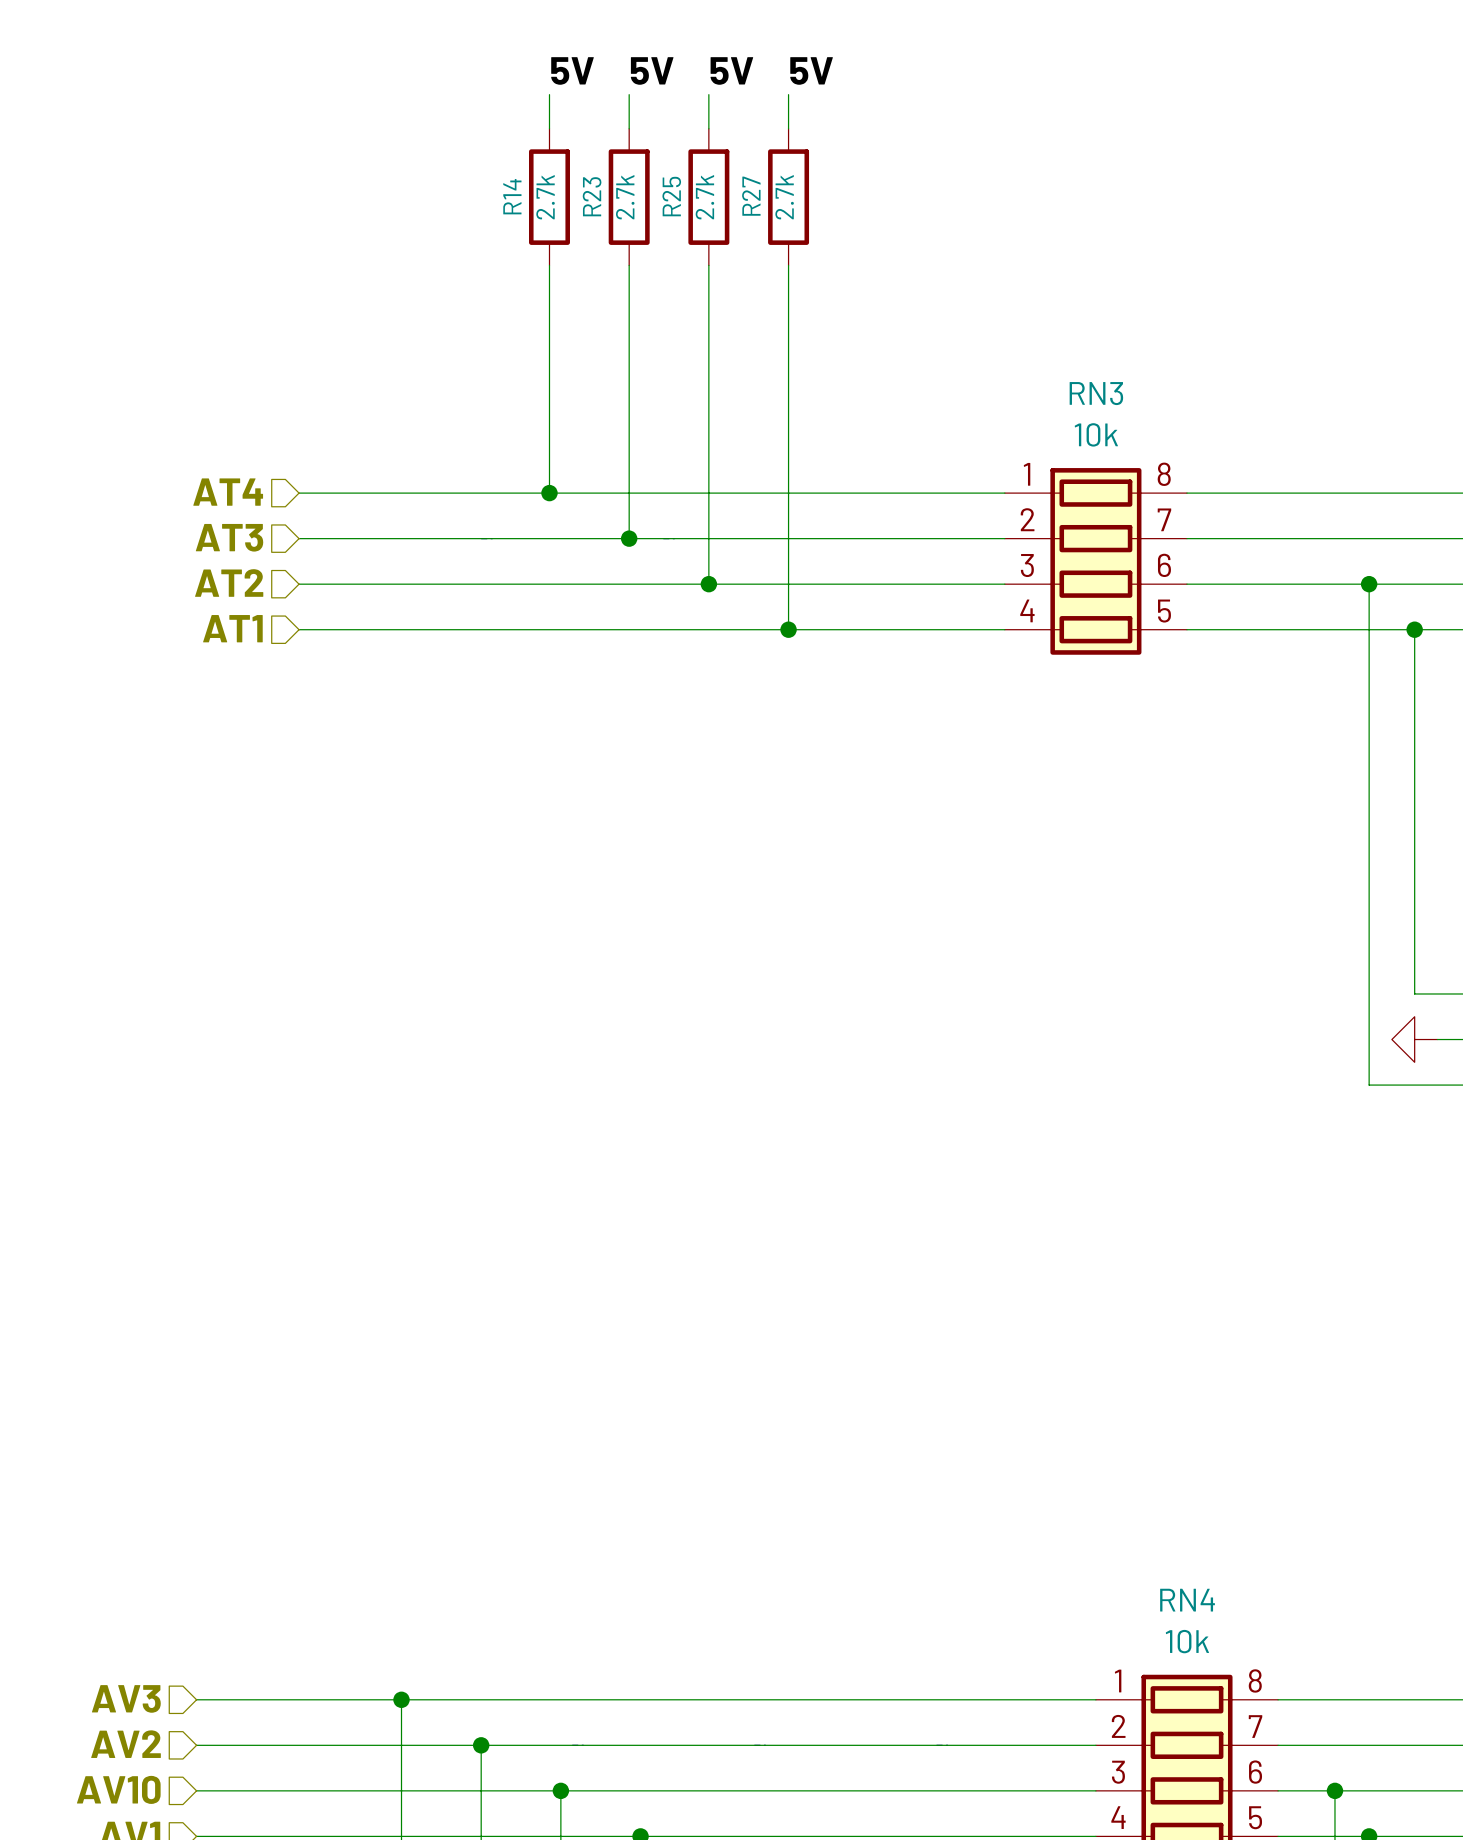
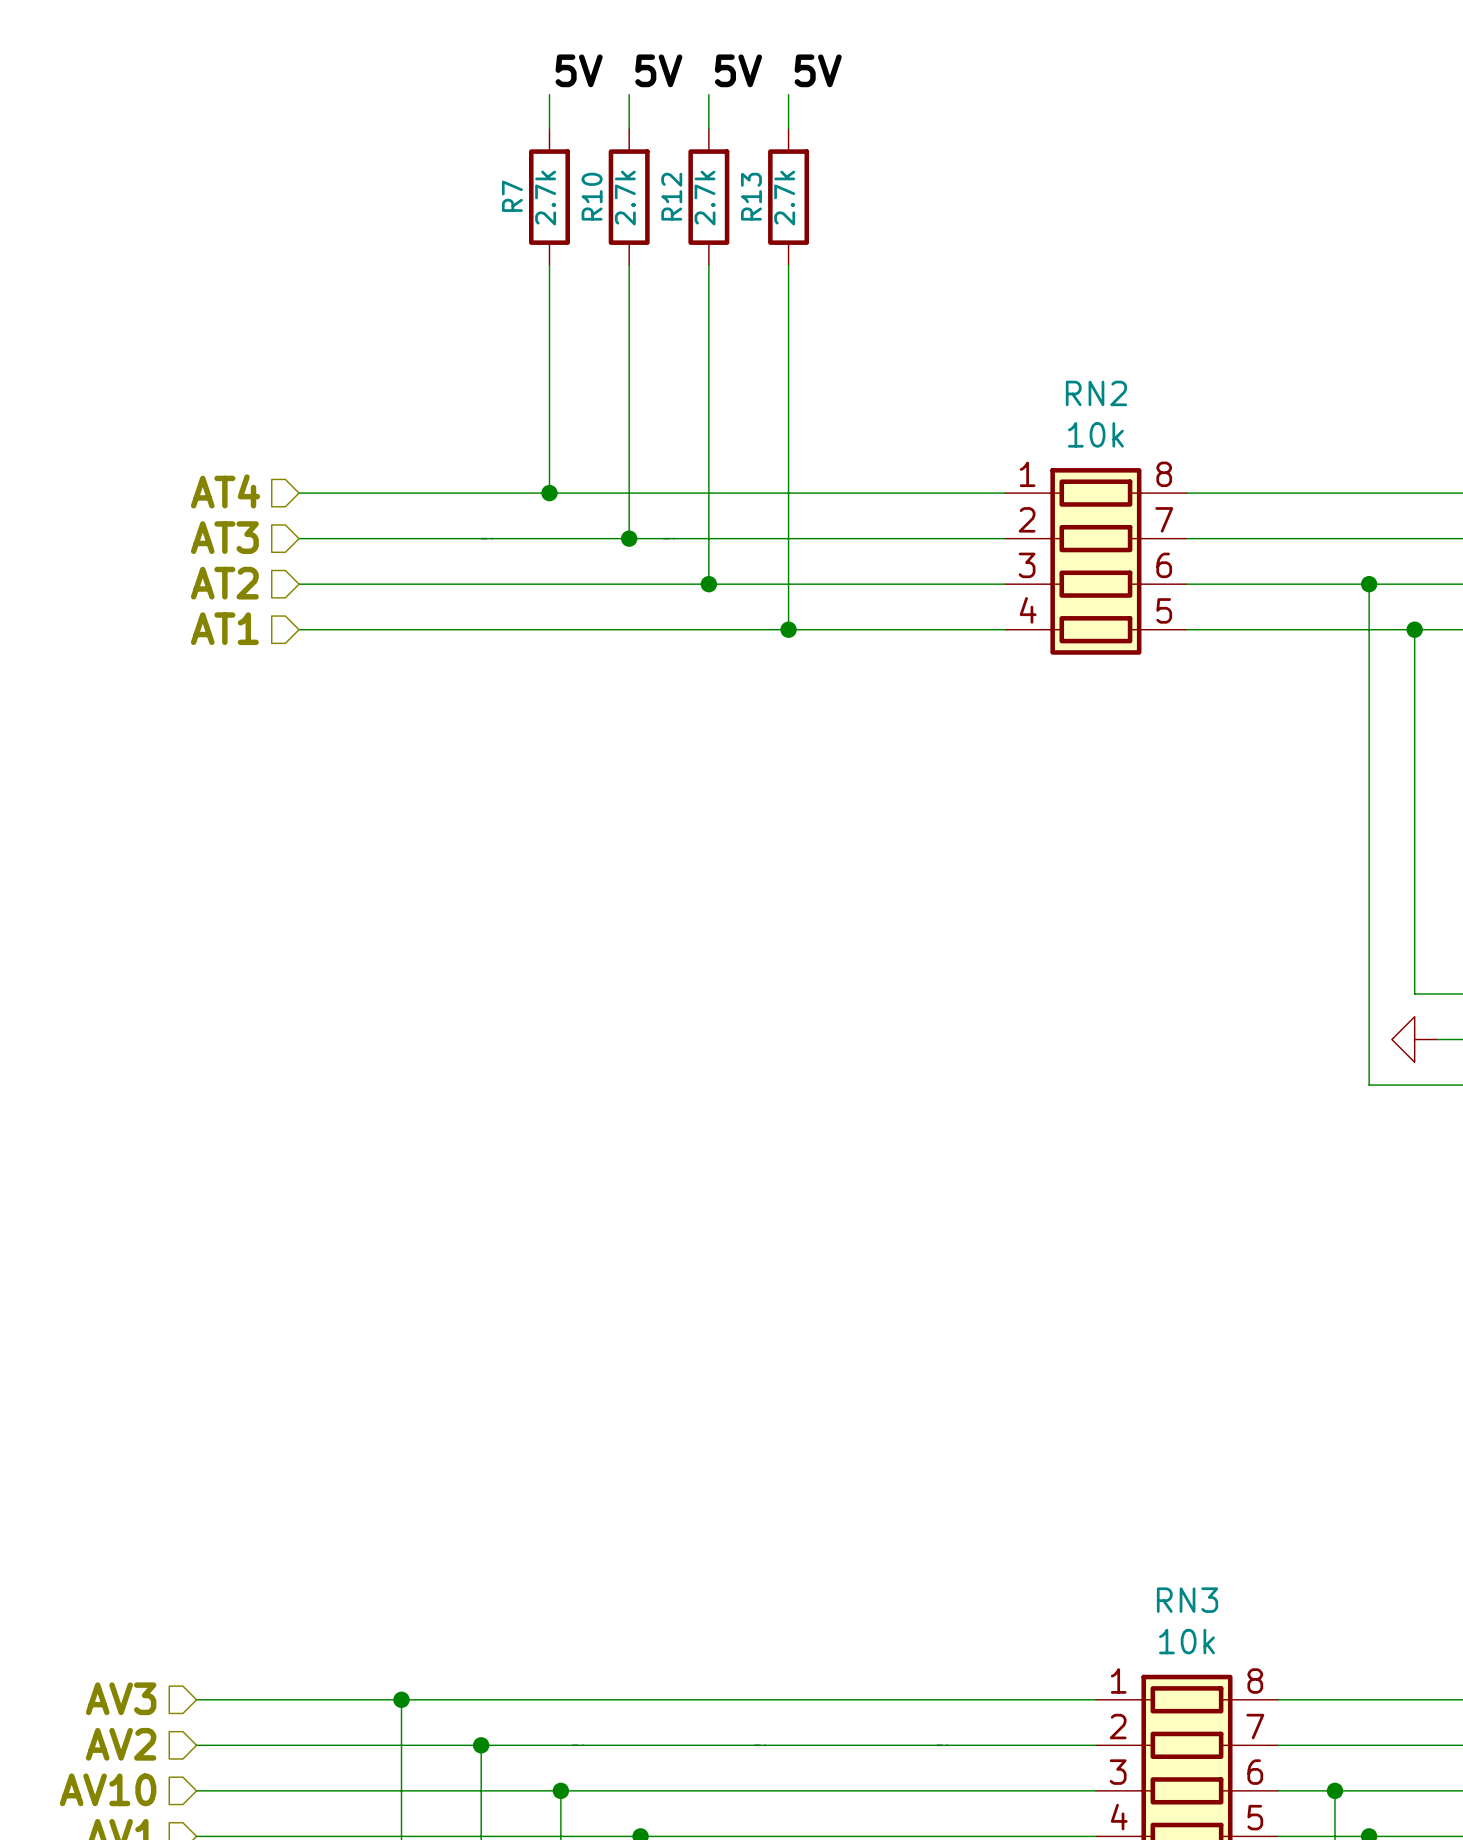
R14 name: R14 (512, 196) -> R7 (512, 196)
R23 name: R23 (592, 196) -> R10 (592, 196)
R25 name: R25 (671, 196) -> R12 (671, 196)
R27 name: R27 (751, 196) -> R13 (751, 196)
RN3 name: RN3 (1096, 393) -> RN2 (1096, 393)
RN4 name: RN4 (1187, 1600) -> RN3 (1187, 1600)

